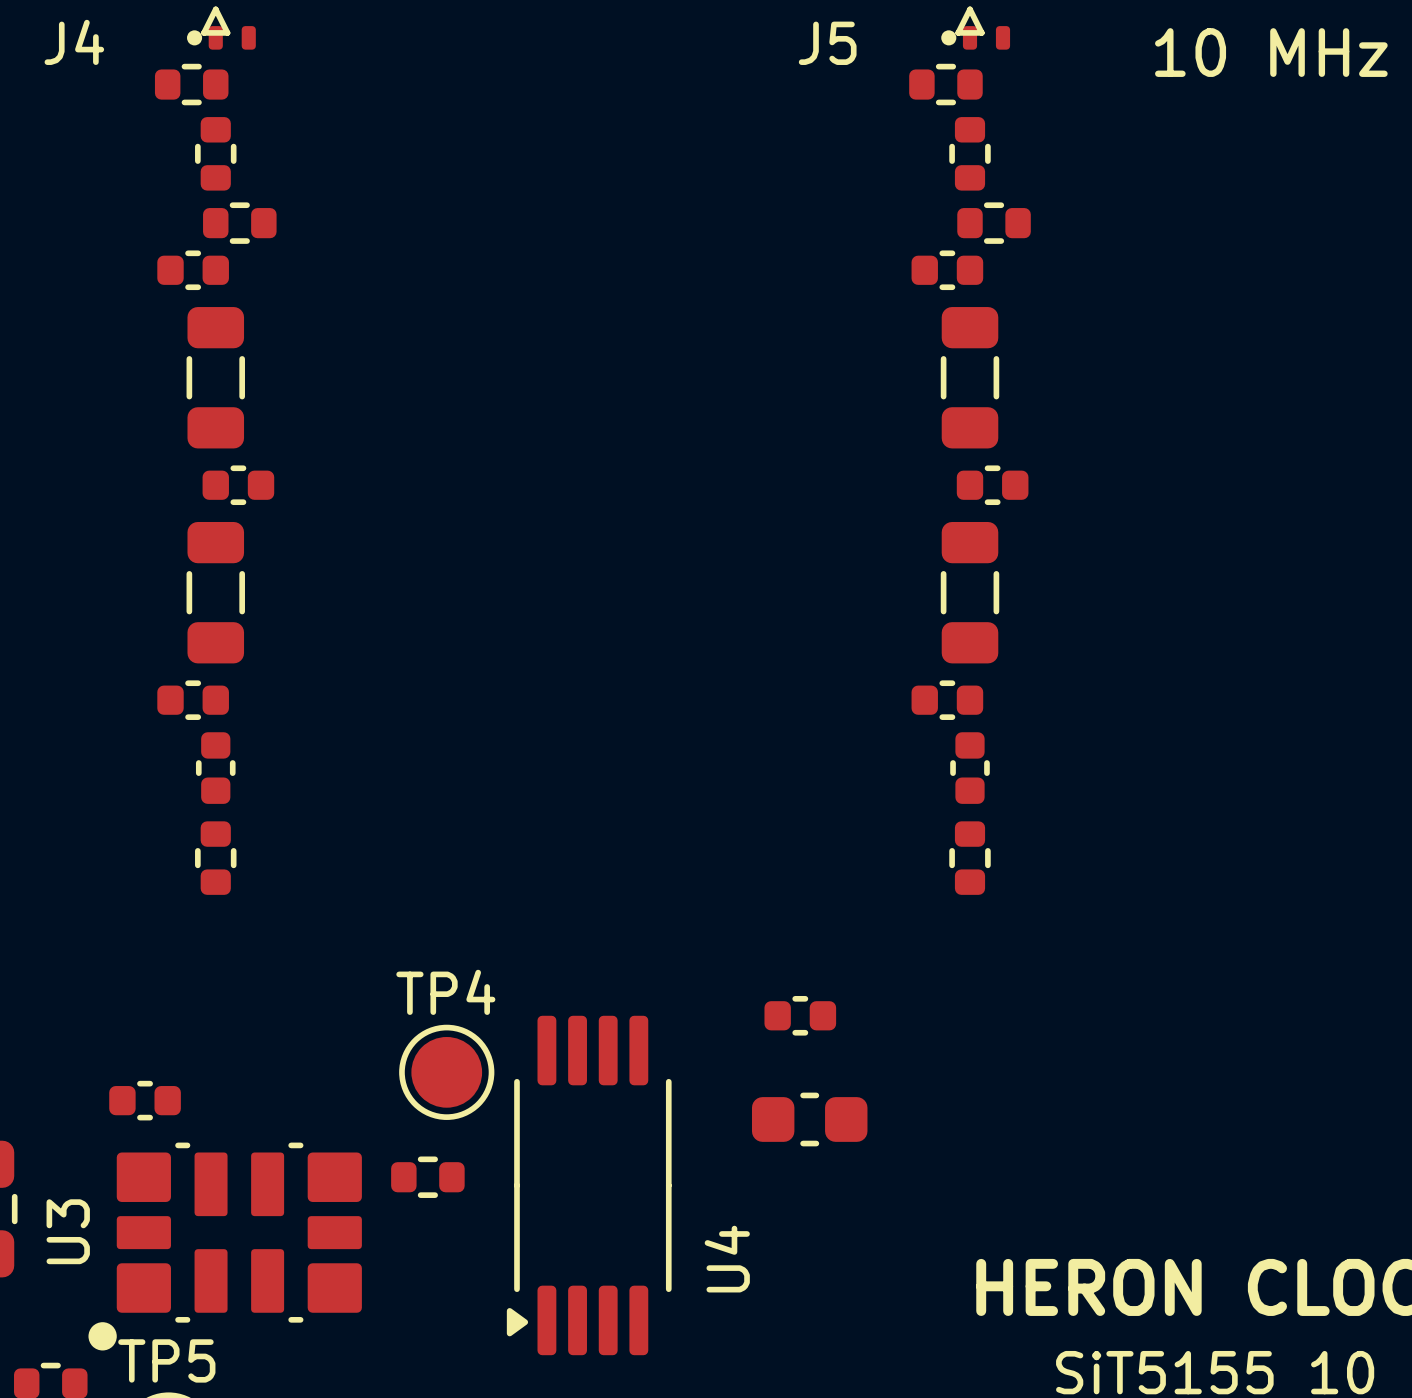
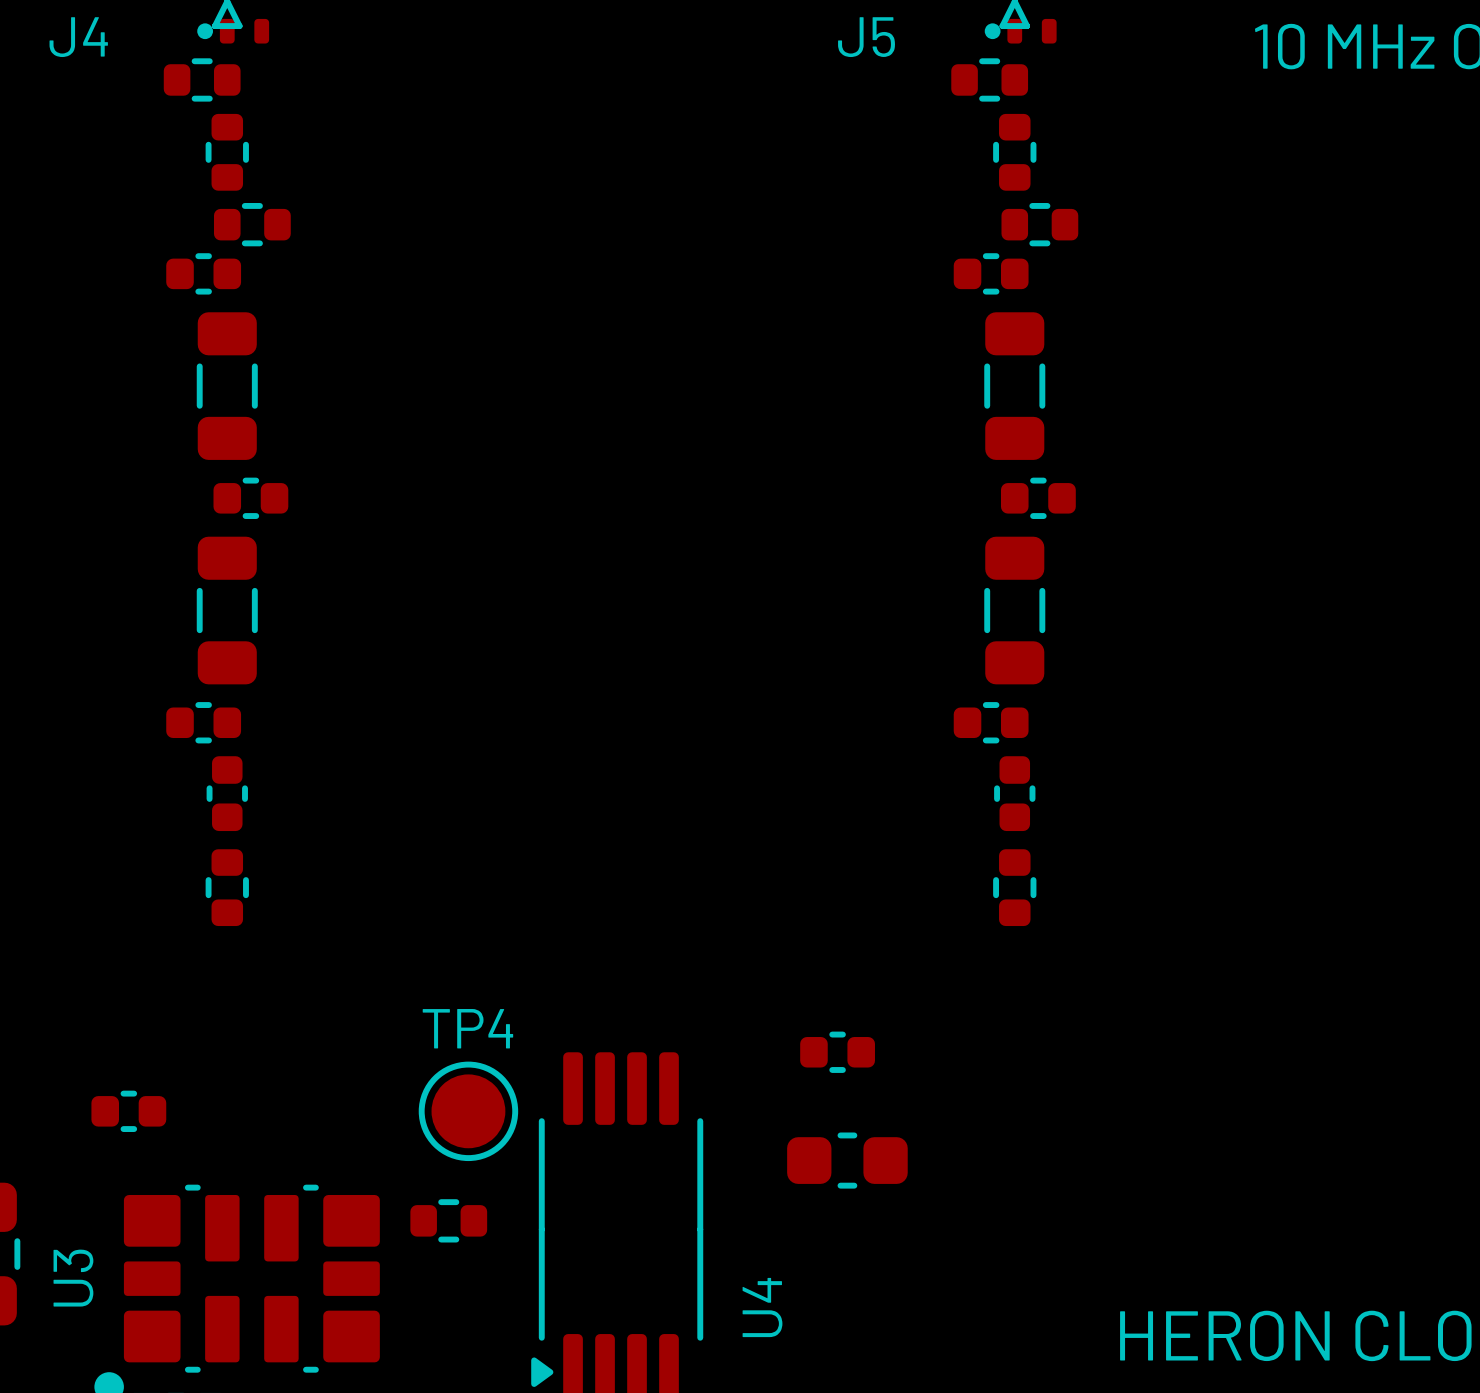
part position: (145, 1100) -> (128, 1111)

